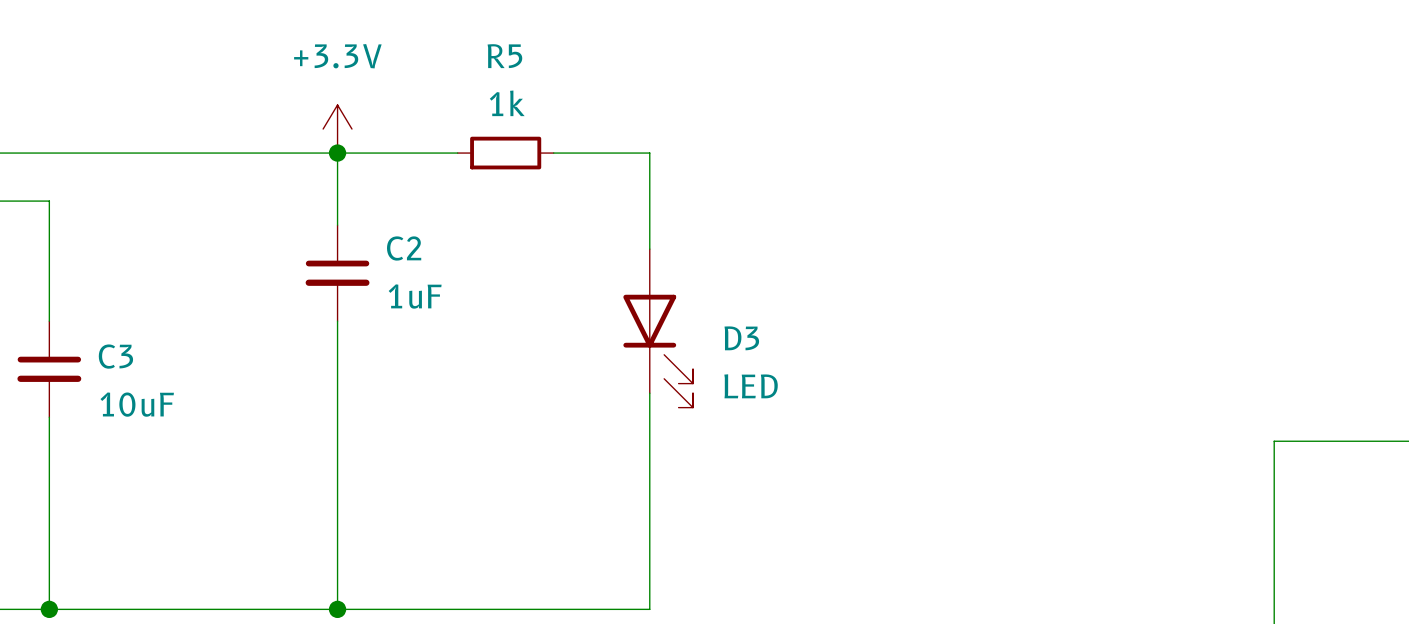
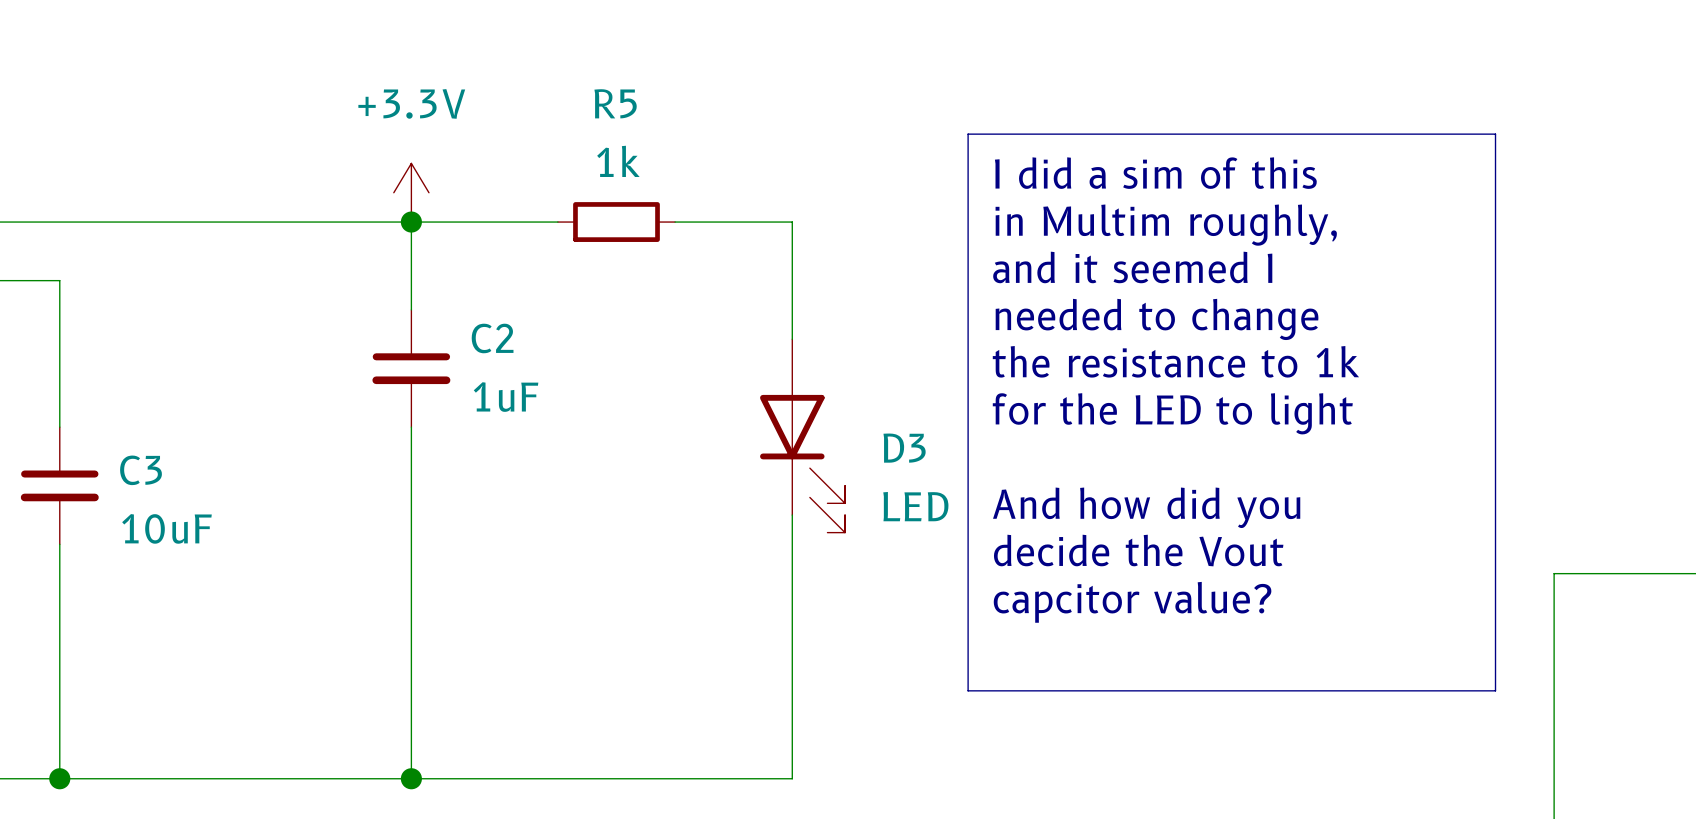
line: none -> (968, 134) (1495, 134) (1495, 690) (968, 690) (968, 134)
text: none -> I did a sim of this (1155, 173)
text: none -> in Multim roughly, (1166, 225)
text: none -> and it seemed I (1132, 267)
text: none -> needed to change (1157, 319)
text: none -> the resistance to 1k (1175, 361)
text: none -> for the LED to light (1172, 413)
text: none -> And how did you (1146, 507)
text: none -> decide the Vout (1138, 550)
text: none -> capcitor value? (1132, 602)

